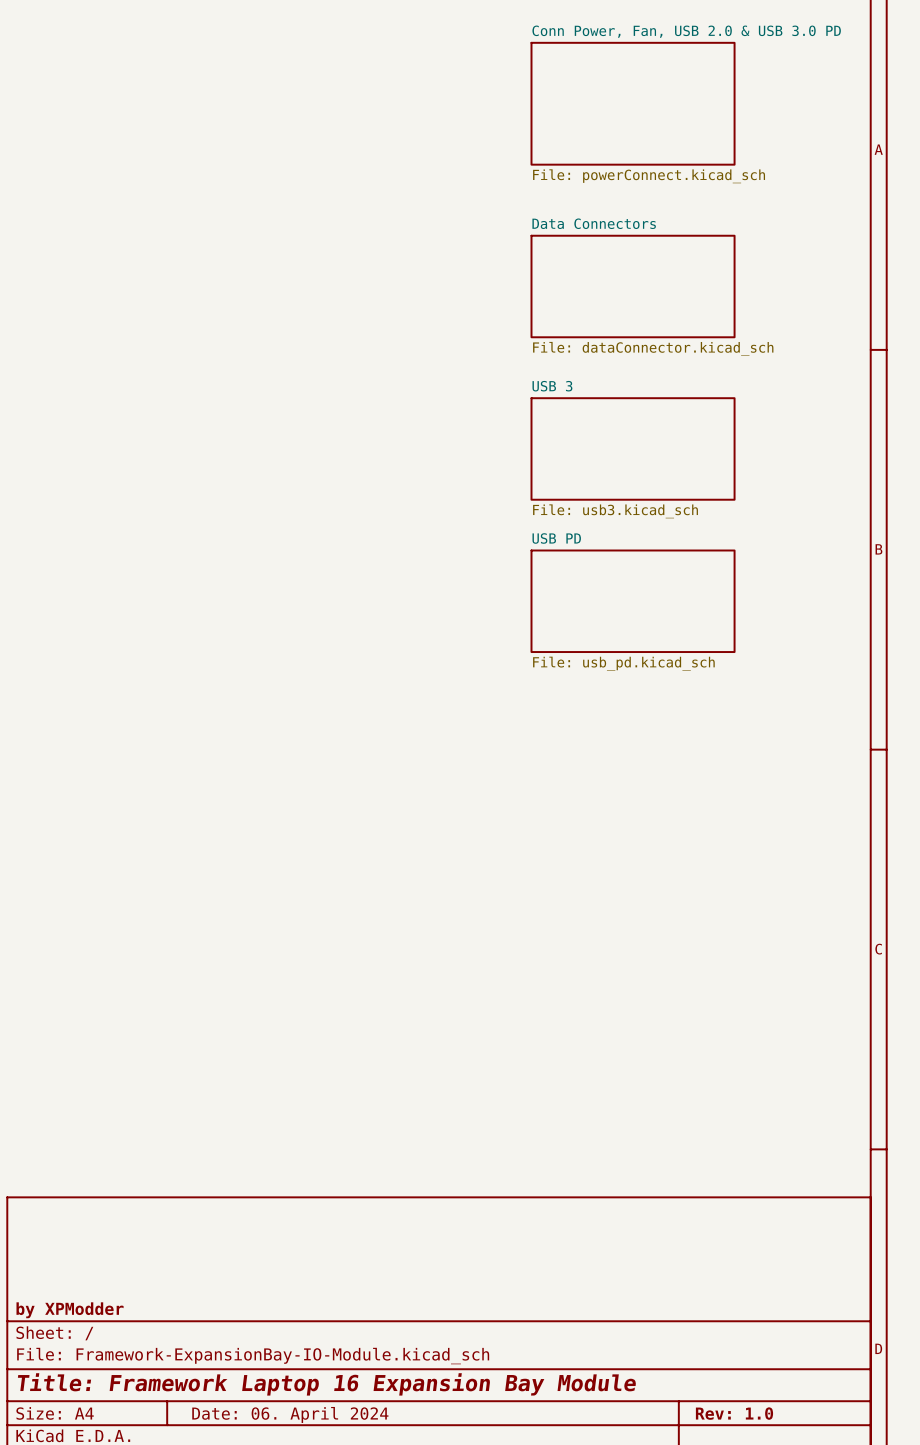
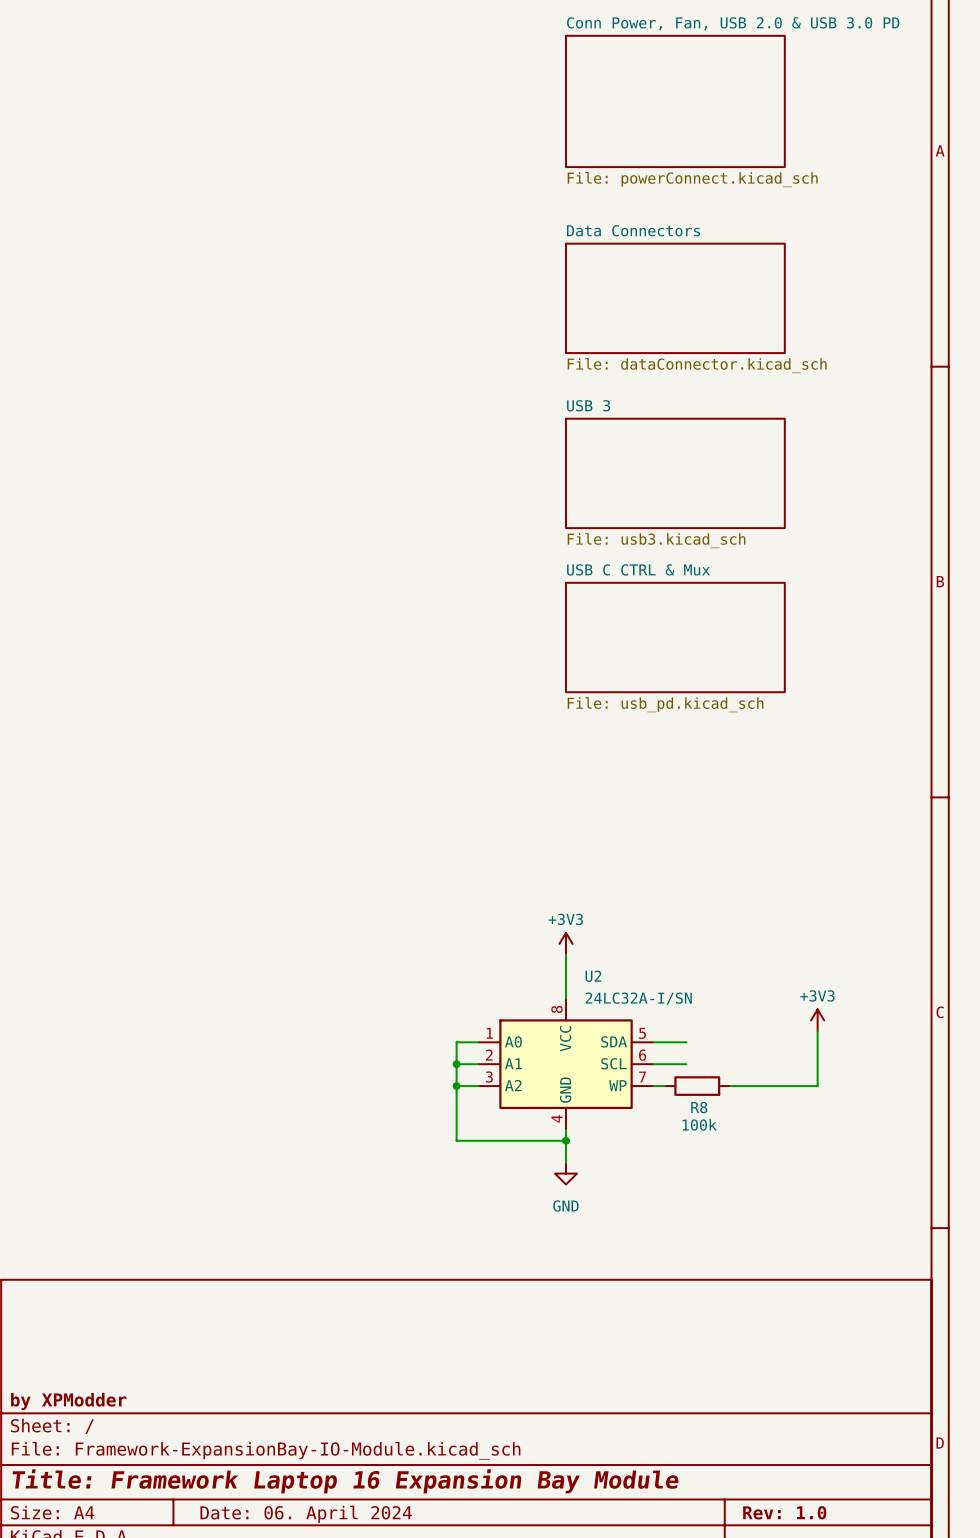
sheet USB PD name: USB PD (556, 538) -> USB C CTRL & Mux (638, 569)
power symbol: none -> +3V3 (566, 943)
wire: none -> (566, 954) (566, 998)
power symbol: none -> +3V3 (817, 1020)
wire: none -> (817, 1031) (817, 1086) (730, 1086)
wire: none -> (478, 1042) (456, 1042) (456, 1140) (566, 1140)
wire: none -> (653, 1042) (686, 1042)
wire: none -> (456, 1064) (478, 1064)
junction: none -> (456, 1064)
U2: none -> 24LC32A-I/SN (566, 1064)
wire: none -> (653, 1064) (686, 1064)
wire: none -> (456, 1086) (478, 1086)
junction: none -> (456, 1086)
wire: none -> (653, 1086) (664, 1086)
R8: none -> 100k (697, 1086)
wire: none -> (566, 1129) (566, 1162)
junction: none -> (566, 1140)
power symbol: none -> GND (566, 1173)

